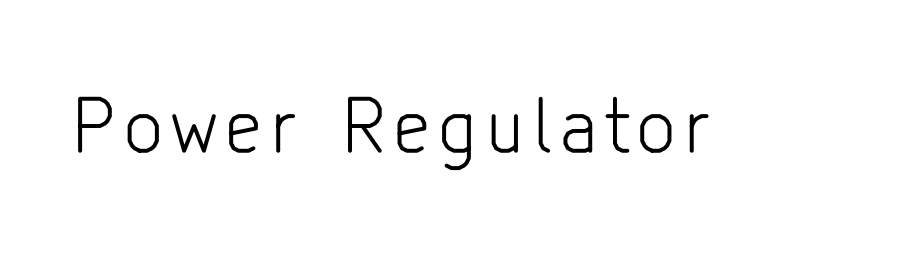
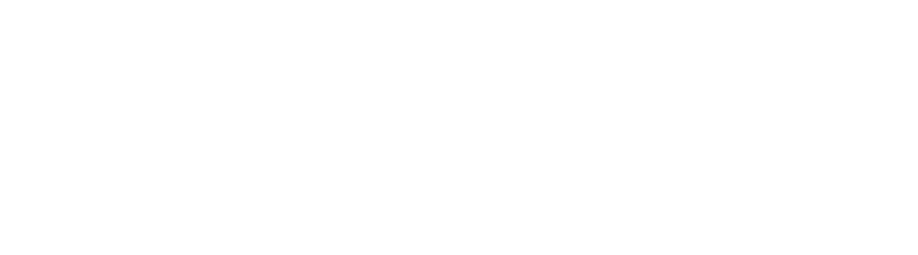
text: Power Regulator (393, 133) -> none

